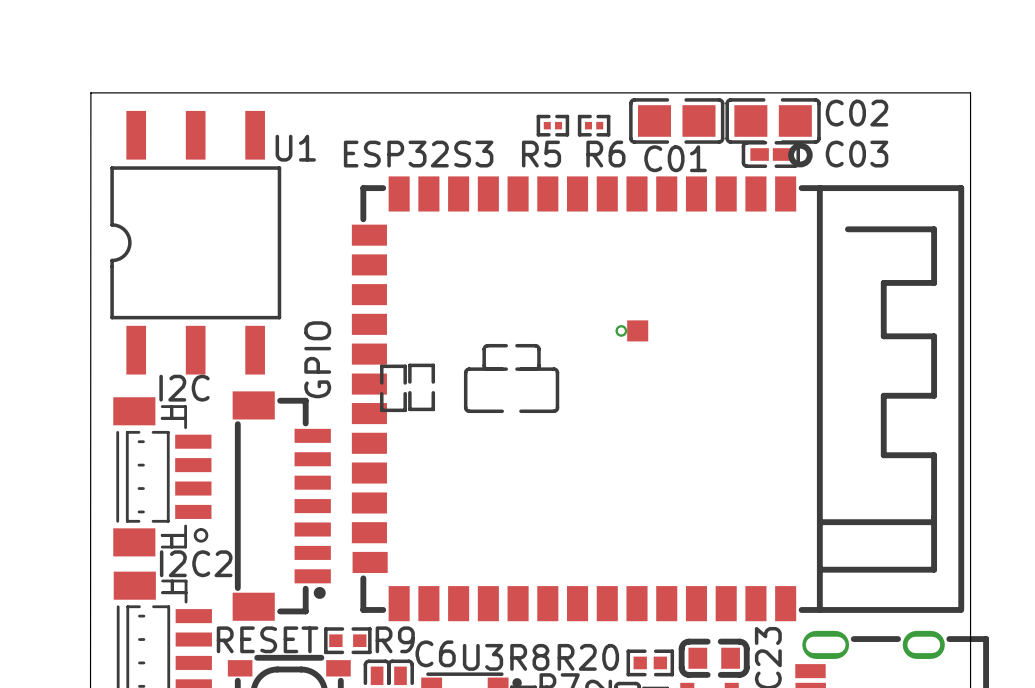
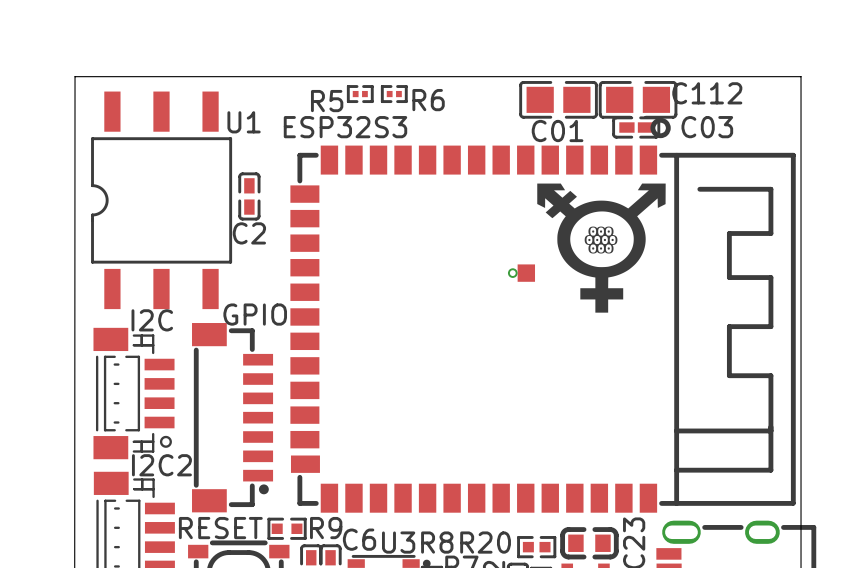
C02 name: C02 (857, 113) -> C112 (707, 93)
R5 position: (552, 125) -> (360, 94)
R6 position: (594, 125) -> (394, 94)
R5 name position: R5 (541, 154) -> R5 (327, 101)
R6 name position: R6 (605, 154) -> R6 (428, 100)
drawing: none -> [537, 183, 666, 313]
C2: none -> (249, 196)
part: (511, 357) -> none
GPIO name rotation: 0° (317, 359) -> 90° clockwise (255, 314)
part: (421, 387) -> none
part: (393, 388) -> none
part: (511, 390) -> none

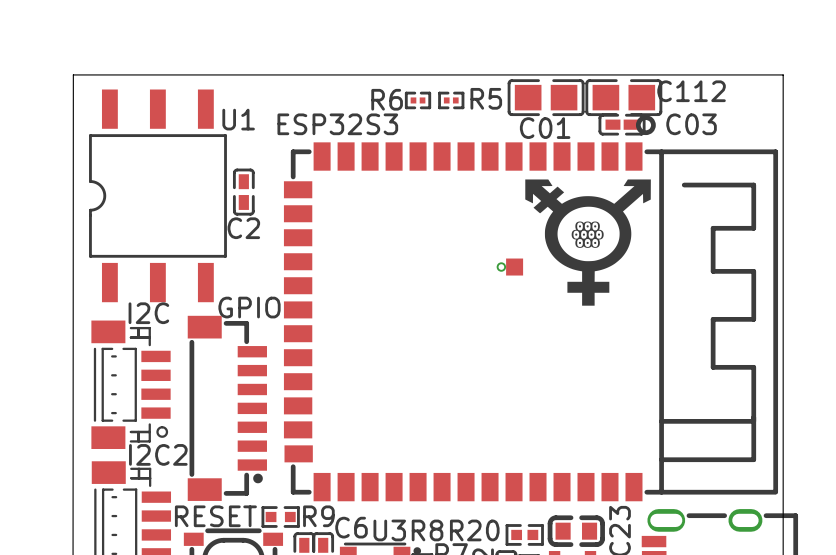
R5 position: (360, 94) -> (451, 100)
R6 position: (394, 94) -> (418, 100)
R6 name position: R6 (428, 100) -> R6 (387, 99)
R5 name position: R5 (327, 101) -> R5 (486, 98)

